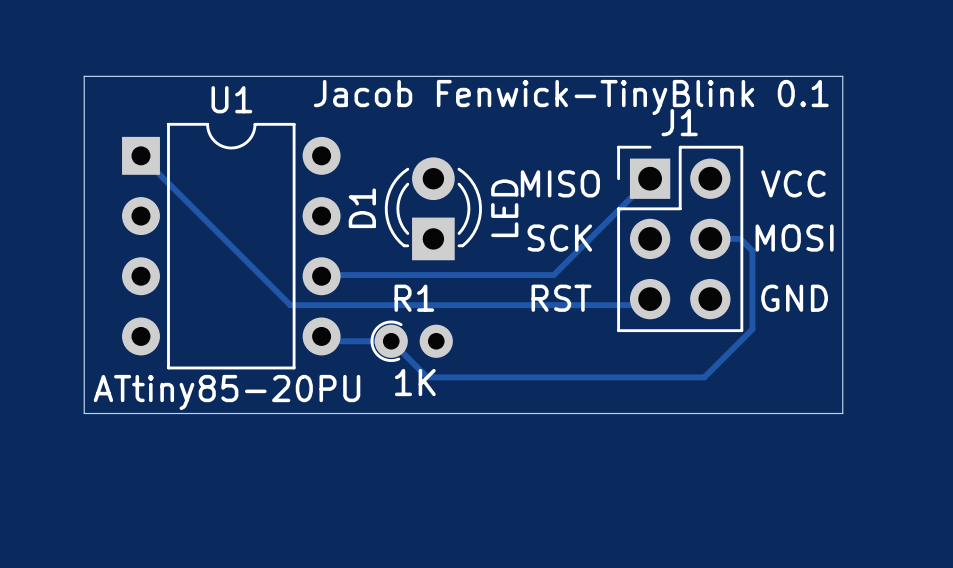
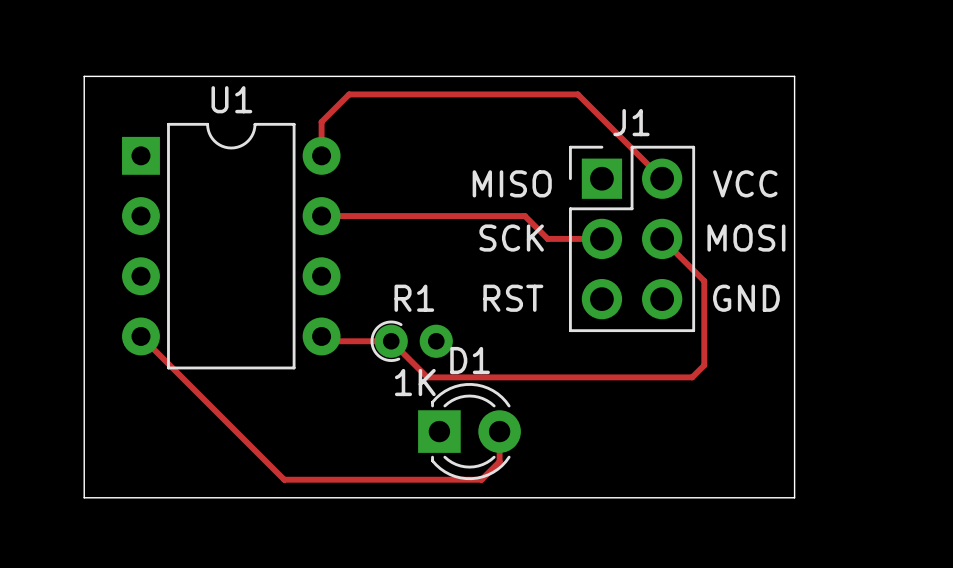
board edge: (794, 76) (842, 76) (842, 413) (84, 413) -> (794, 76) (794, 497) (84, 497) (84, 413)
text: Jacob Fenwick-TinyBlink 0.1 (571, 97) -> none
track: (140, 155) (290, 305) (644, 305) (650, 299) -> none
track: none -> (321, 155) (321, 121) (349, 94) (577, 94) (662, 178)
track: (650, 178) (553, 275) (321, 276) -> none
text position: MISO (560, 183) -> MISO (512, 183)
text position: VCC (793, 183) -> VCC (745, 183)
D1 rotation: 0° (433, 208) -> 90° clockwise (469, 431)
D1 position: (433, 208) -> (469, 431)
text: LED (504, 208) -> none
track: none -> (321, 216) (524, 216) (547, 238) (601, 238)
text position: SCK (559, 238) -> SCK (511, 238)
J1 position: (680, 238) -> (632, 238)
track: (710, 238) (740, 238) (752, 250) (752, 329) (704, 377) (692, 377) -> (662, 238) (704, 281) (704, 365) (692, 377)
text position: MOSI (794, 238) -> MOSI (746, 238)
text position: RST (561, 298) -> RST (513, 298)
text position: GND (794, 298) -> GND (746, 298)
track: none -> (140, 336) (284, 479) (481, 479) (499, 461) (499, 431)
text: ATtiny85-20PU (227, 392) -> none

